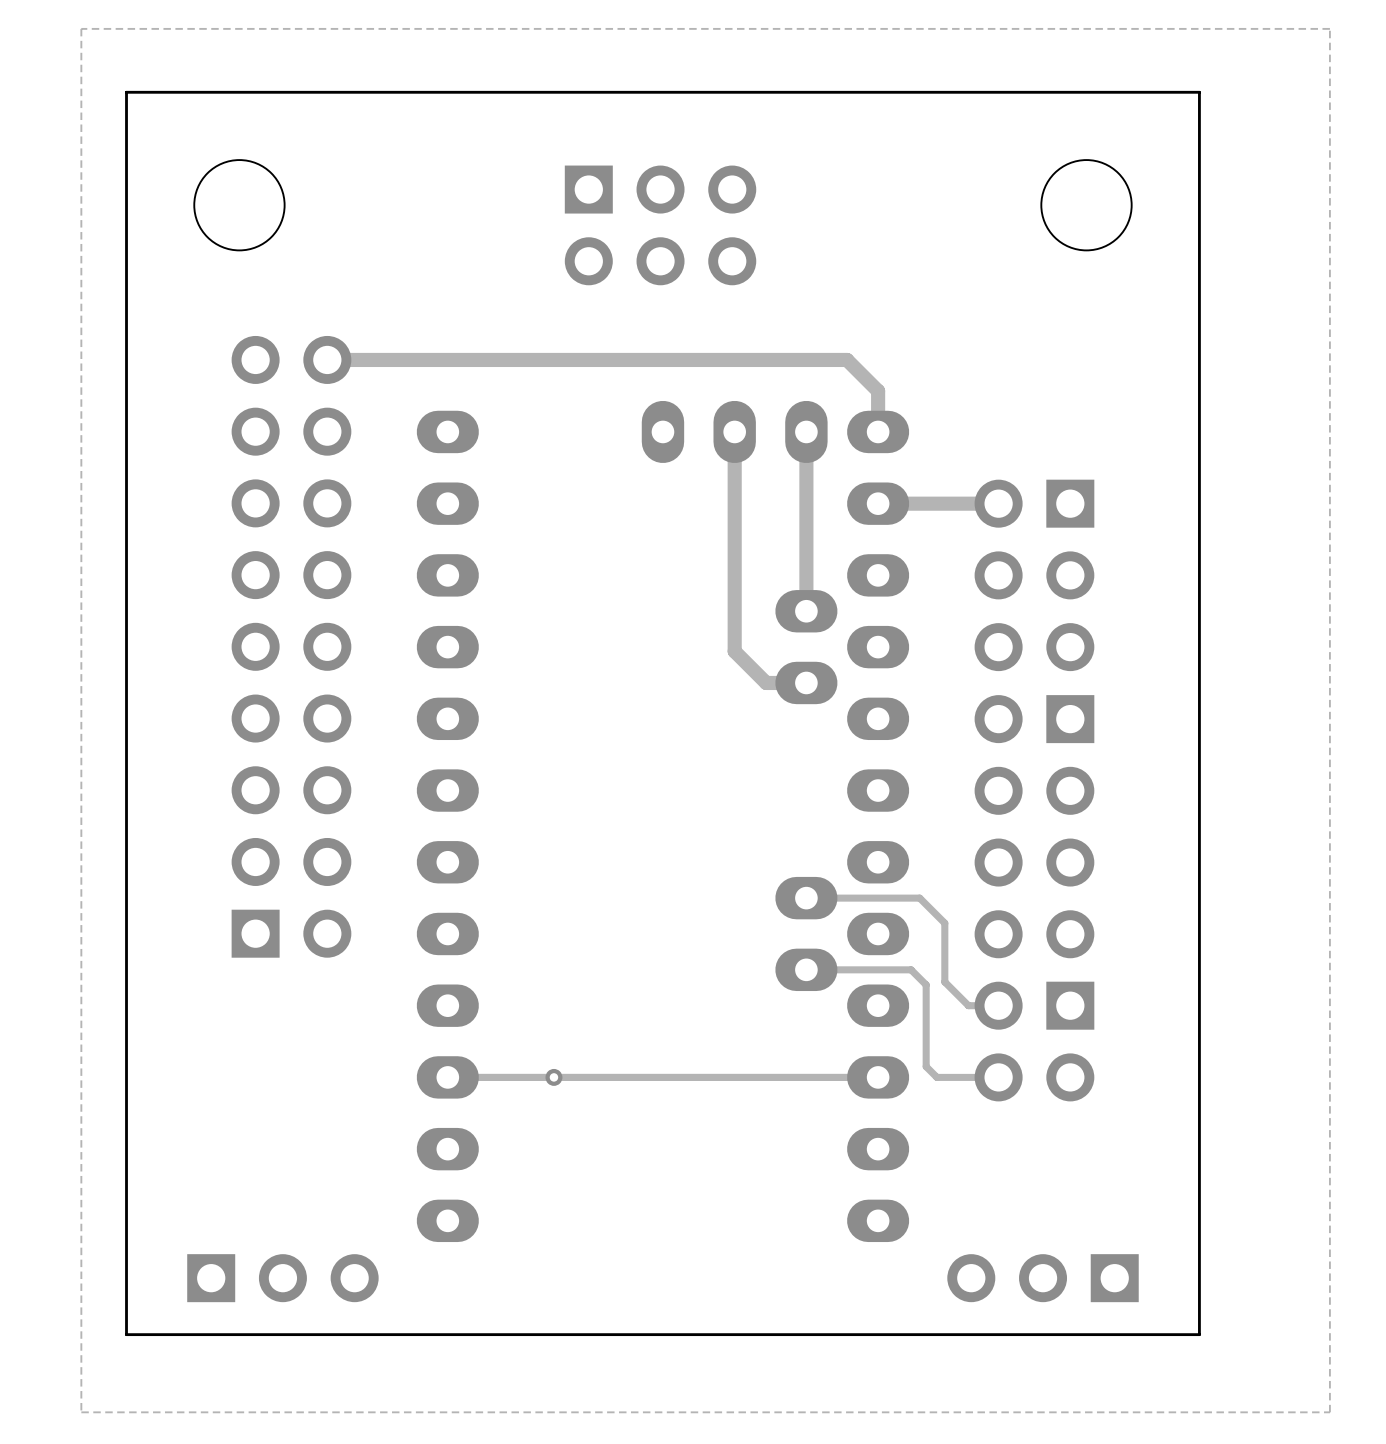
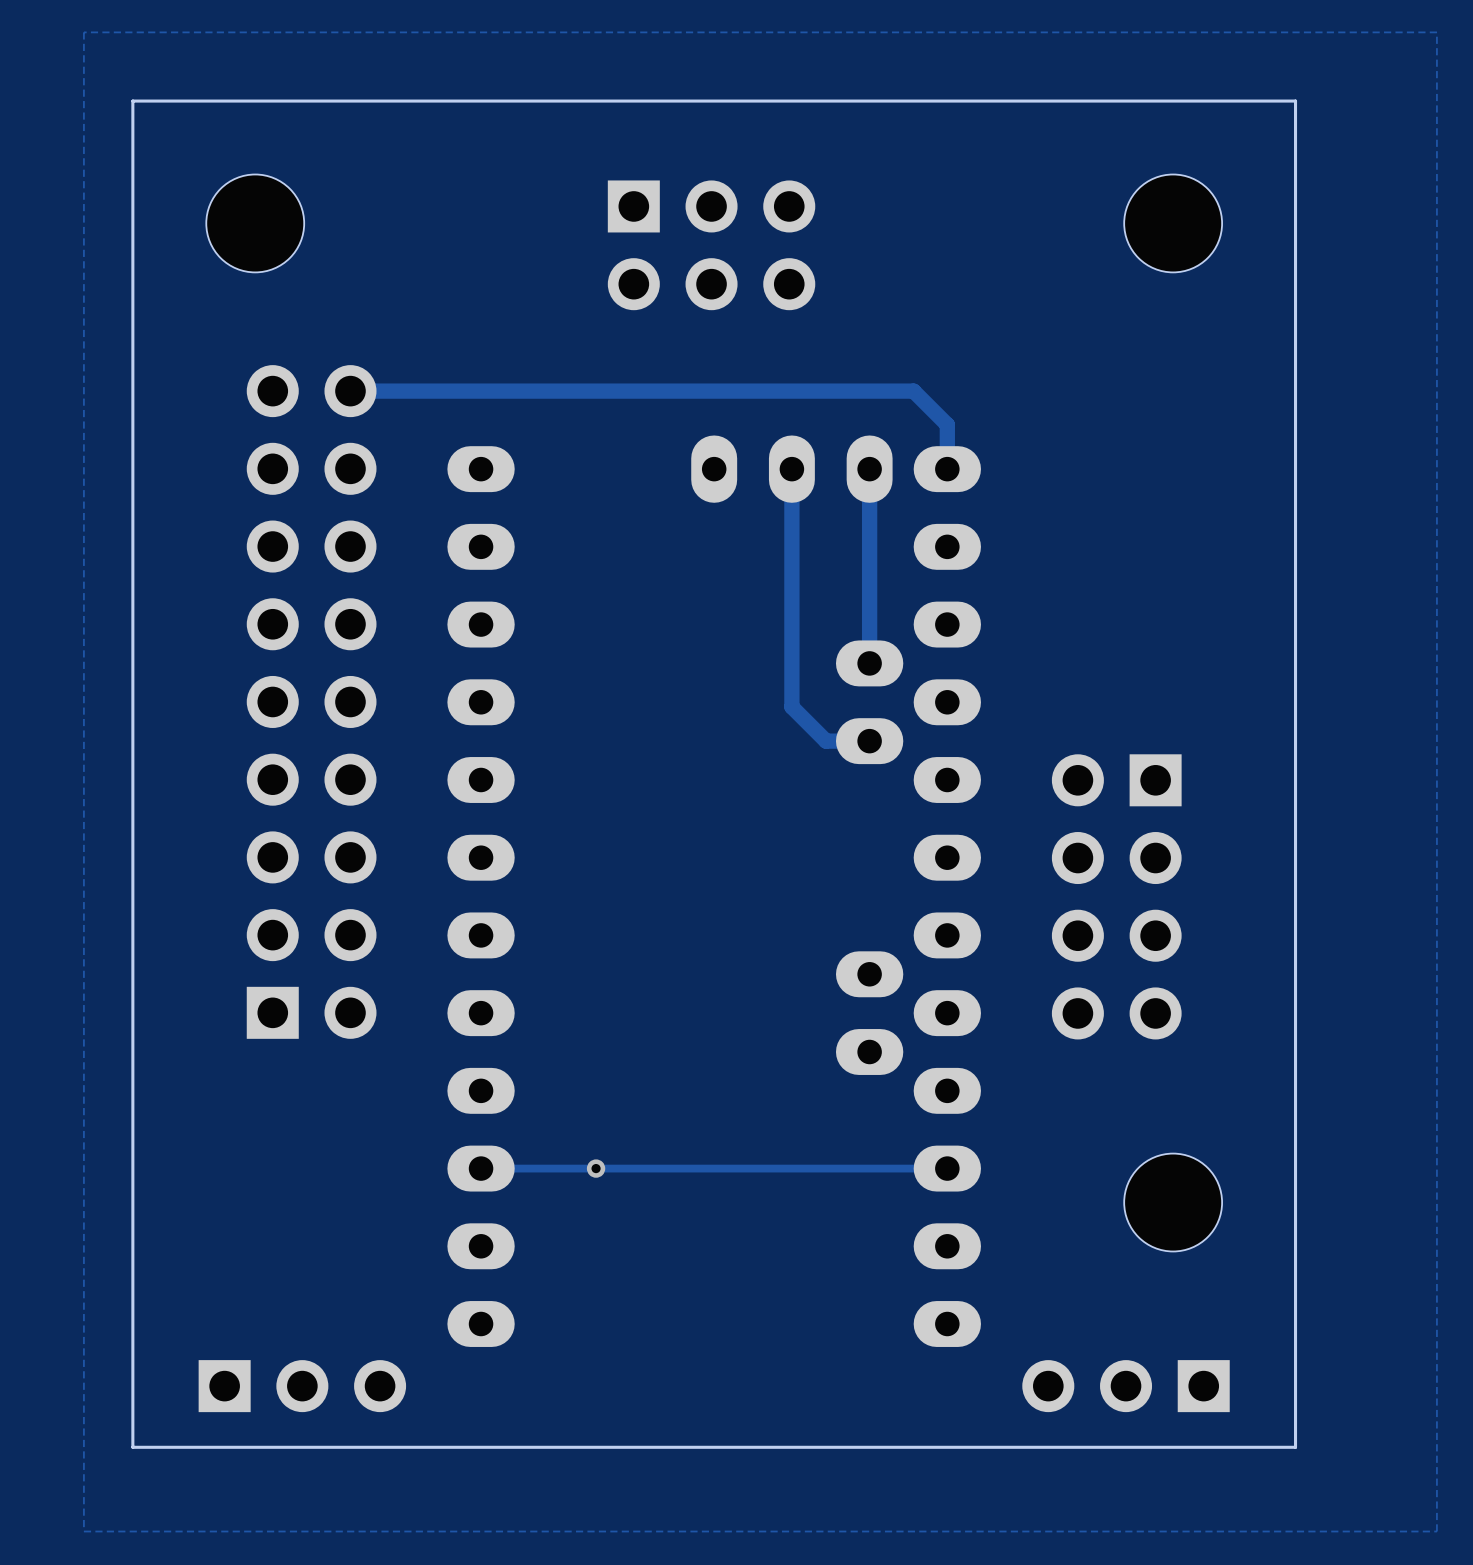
track: (998, 503) (878, 503) -> none
part: (1034, 575) -> none
track: (806, 898) (919, 898) (944, 923) (944, 982) (968, 1005) (998, 1005) -> none
track: (806, 969) (911, 969) (926, 984) (926, 1066) (936, 1077) (998, 1077) -> none
part: (1034, 1041) -> none
part: none -> (1173, 1202)

